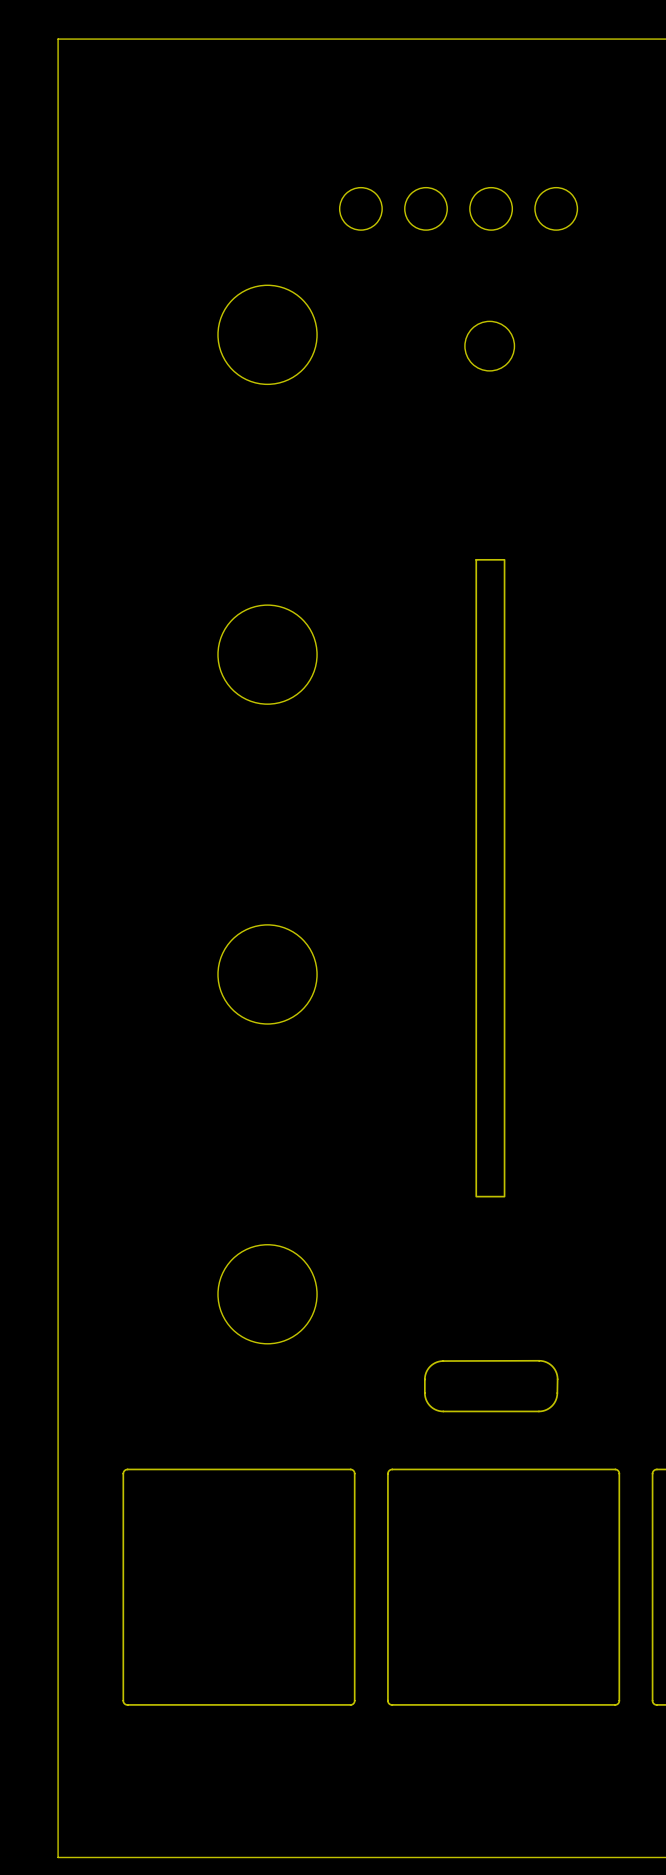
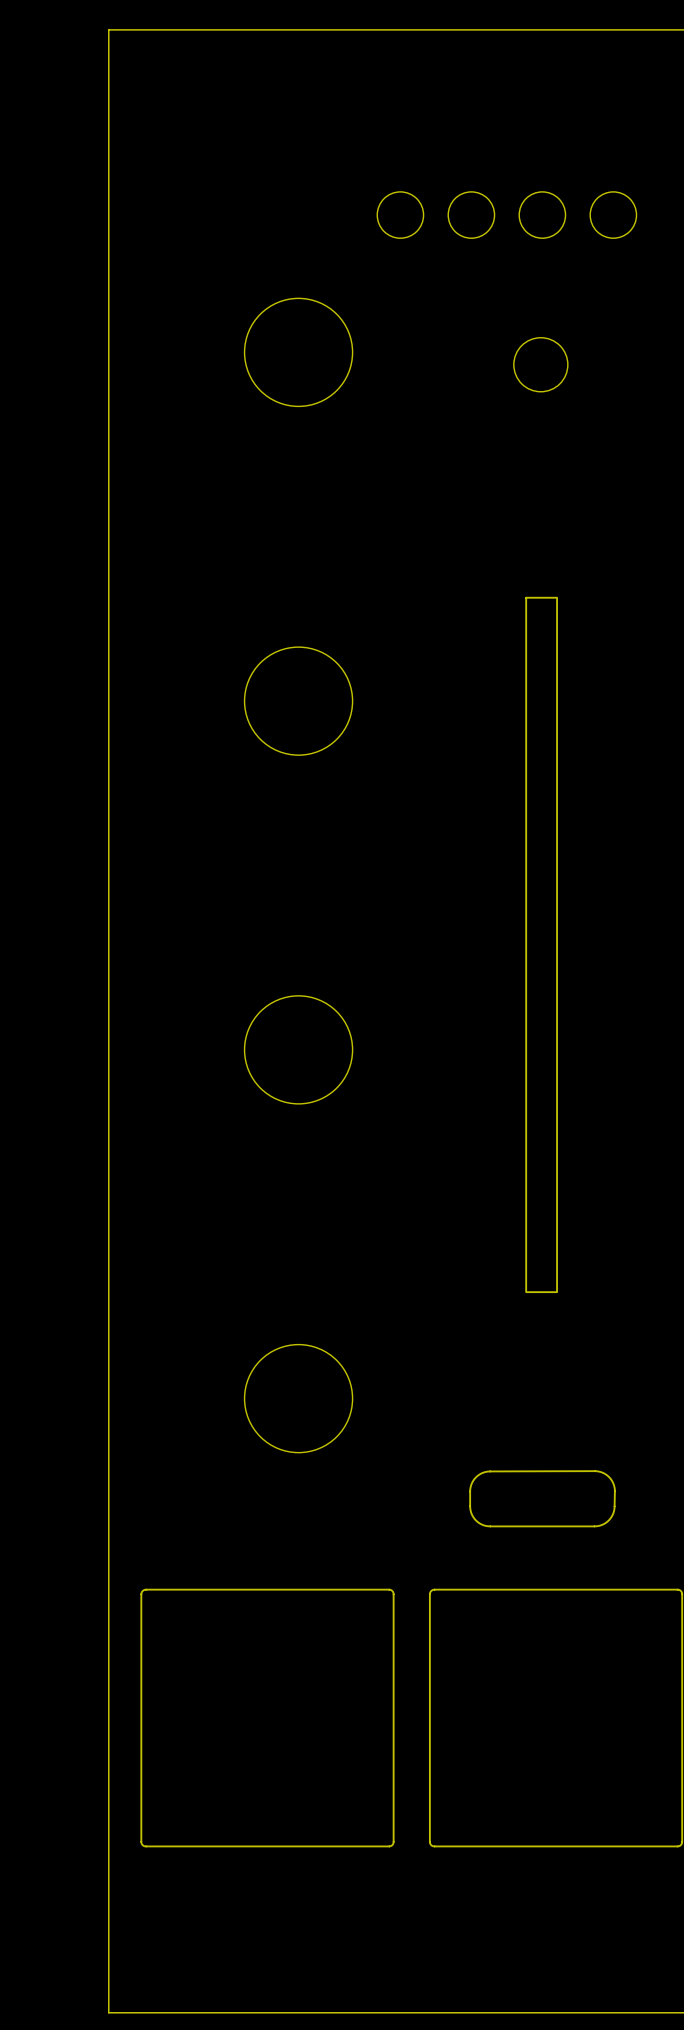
board edge: (93, 39) (58, 39) (58, 1857) (93, 1857) -> (108, 29) (108, 2012)

